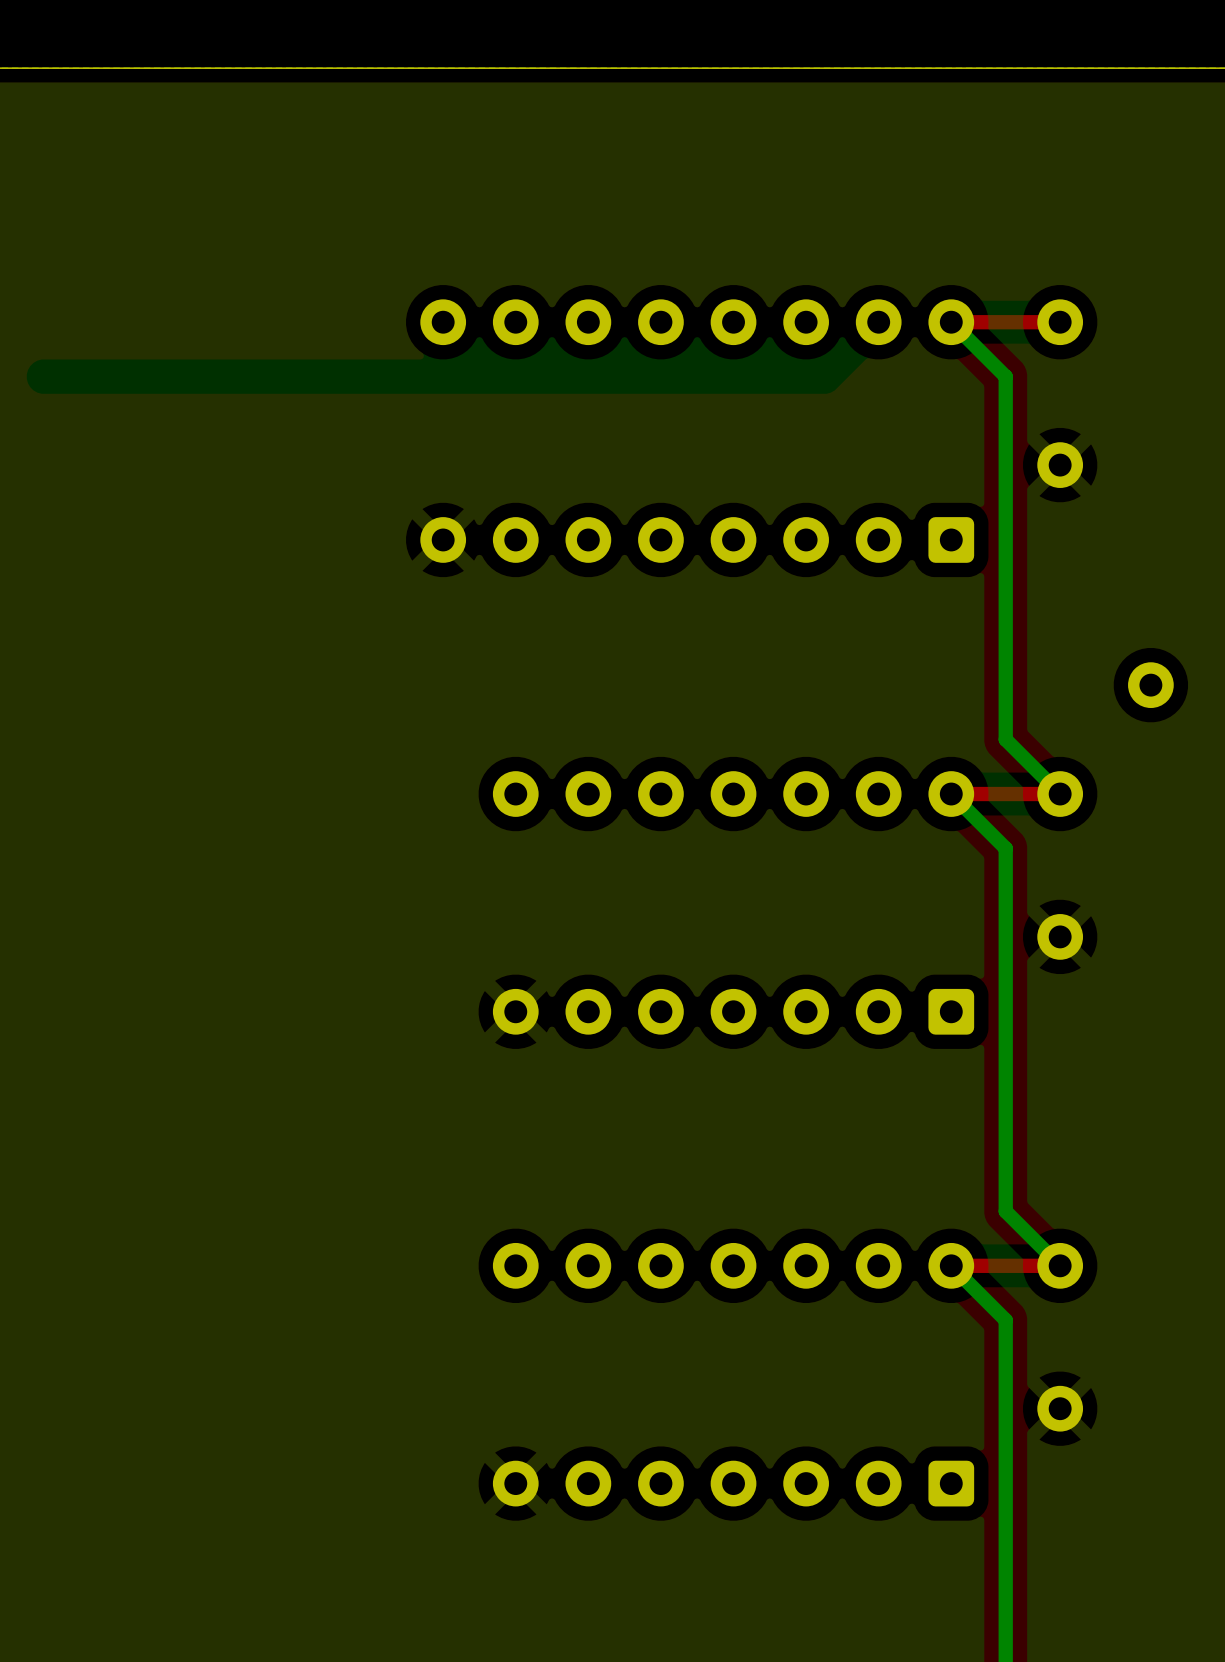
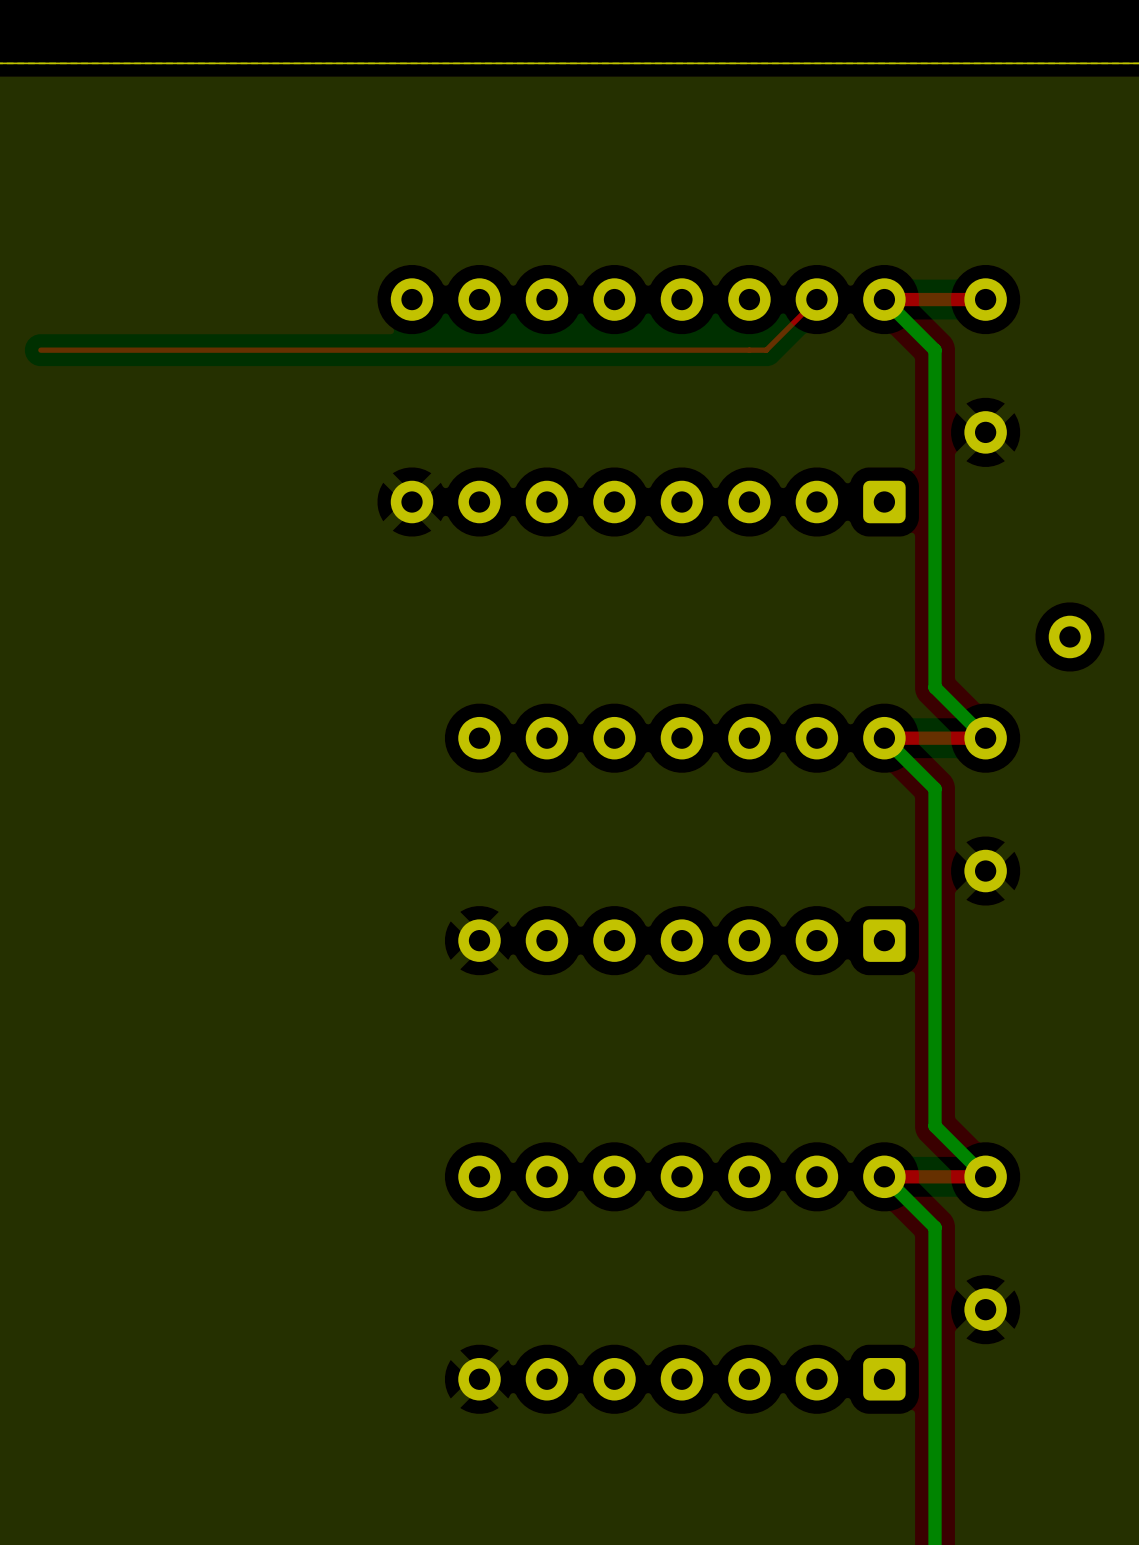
top track: none -> (816, 299) (766, 350) (40, 350)

